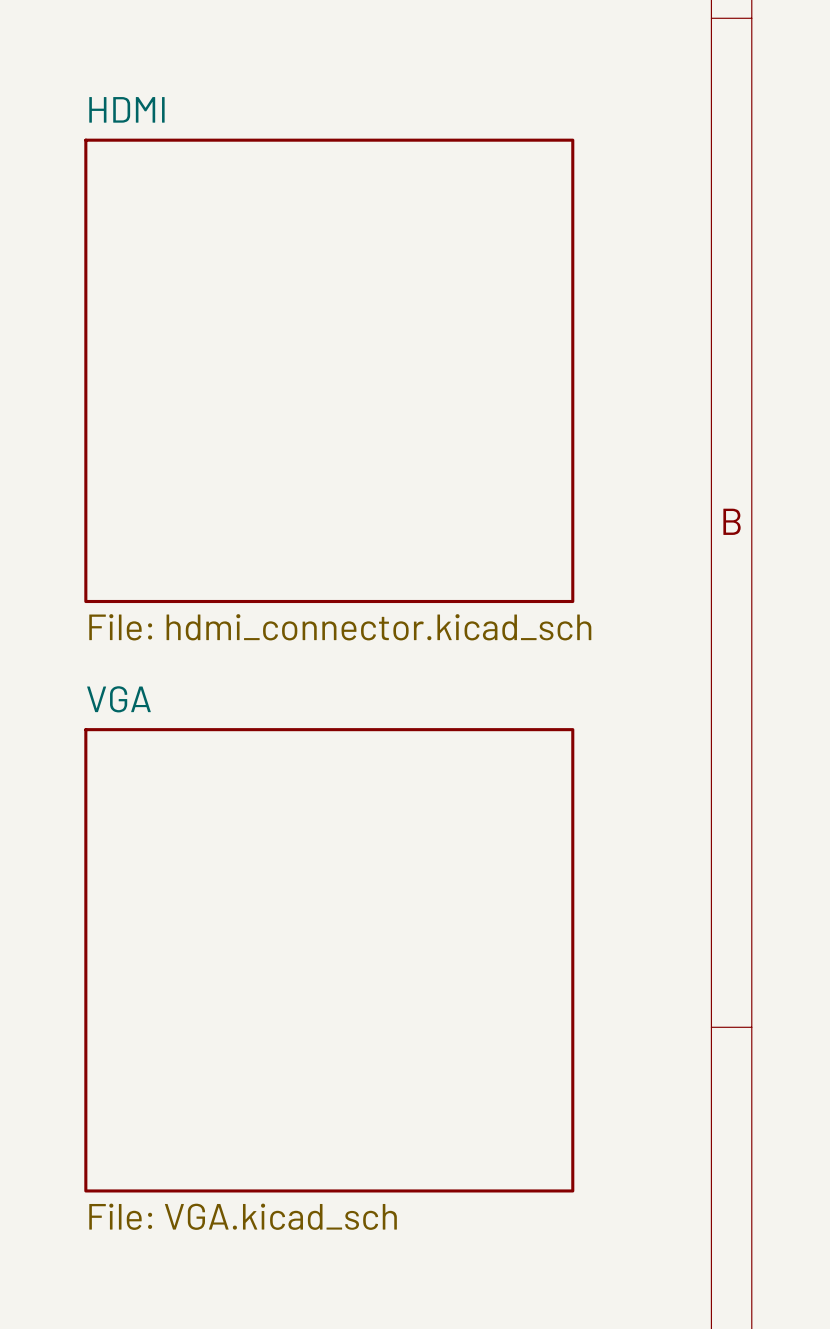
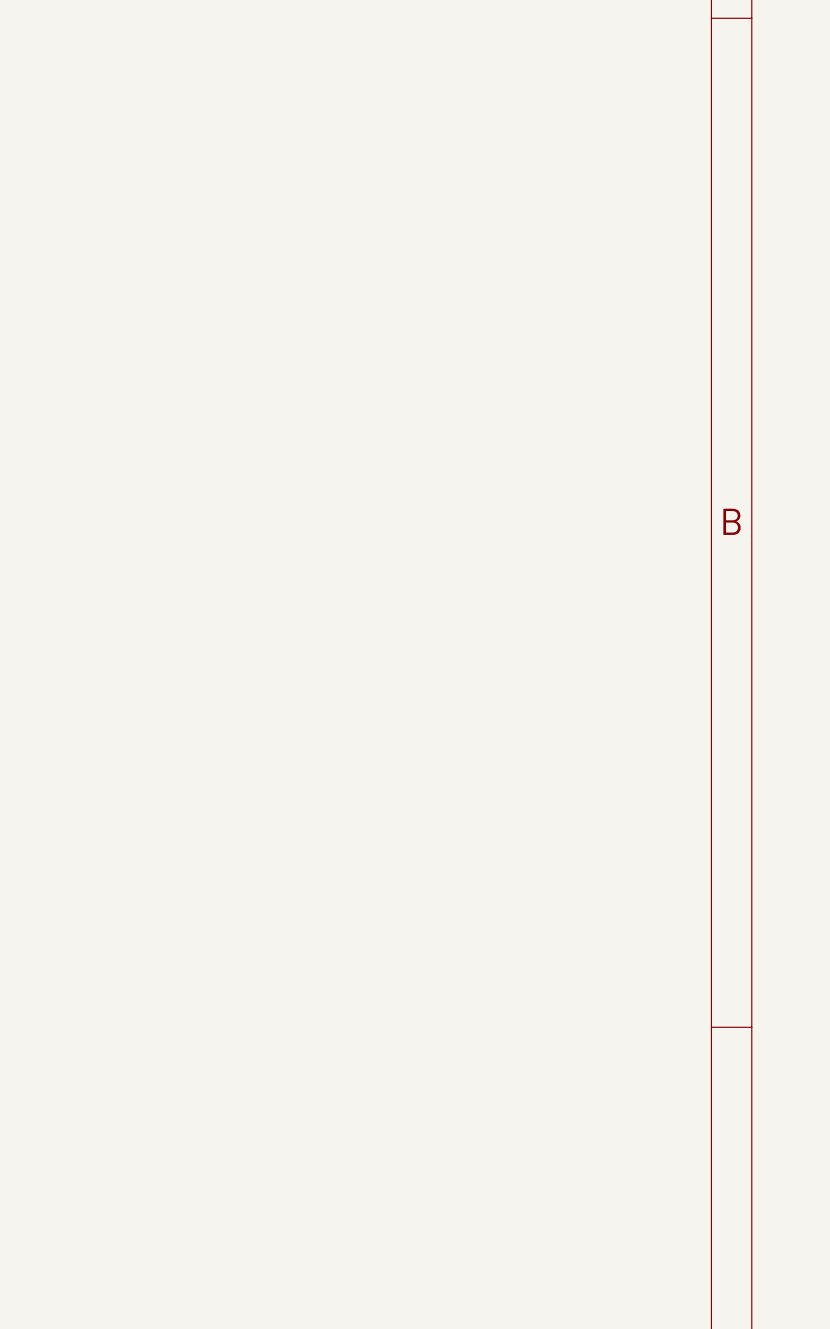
sheet HDMI: File: hdmi_connector.kicad_sch (329, 370) -> none
sheet VGA: File: VGA.kicad_sch (329, 960) -> none

